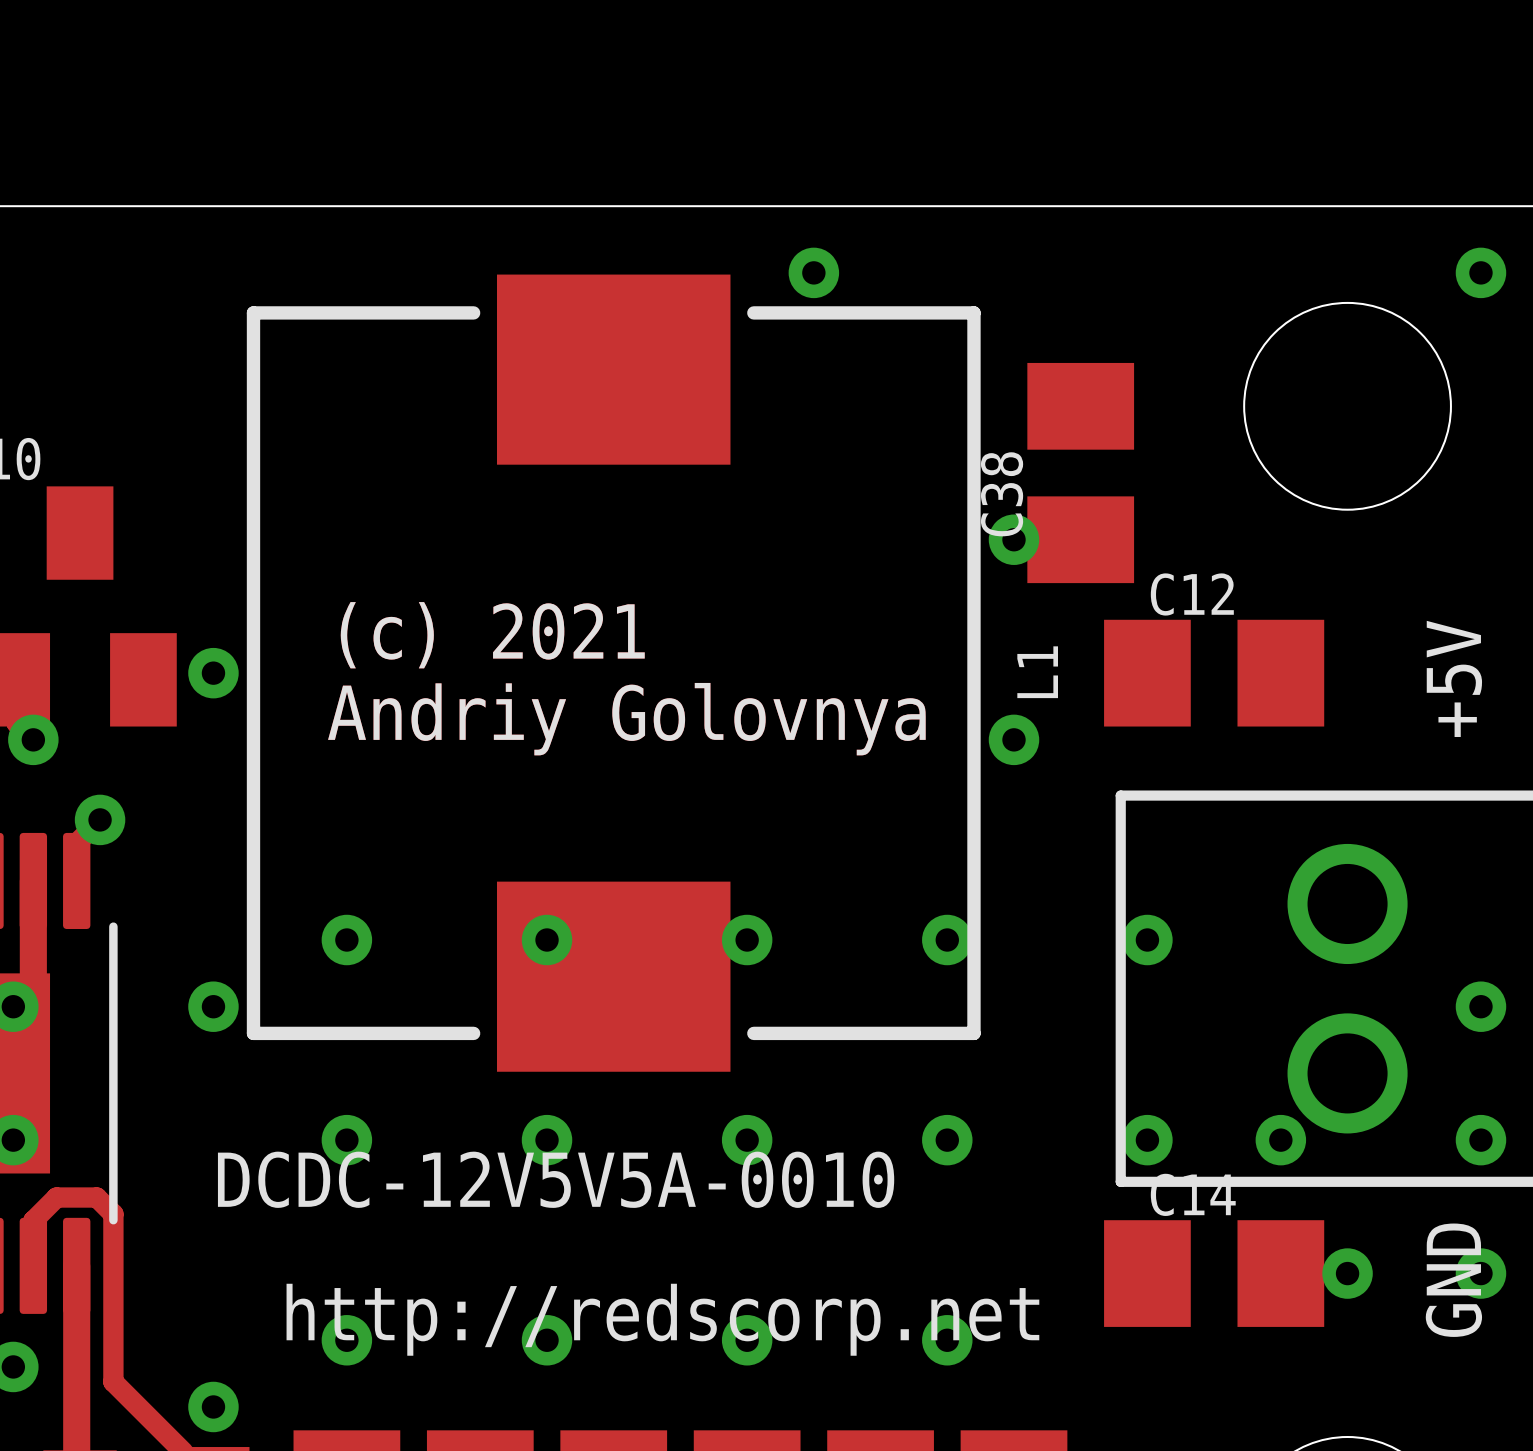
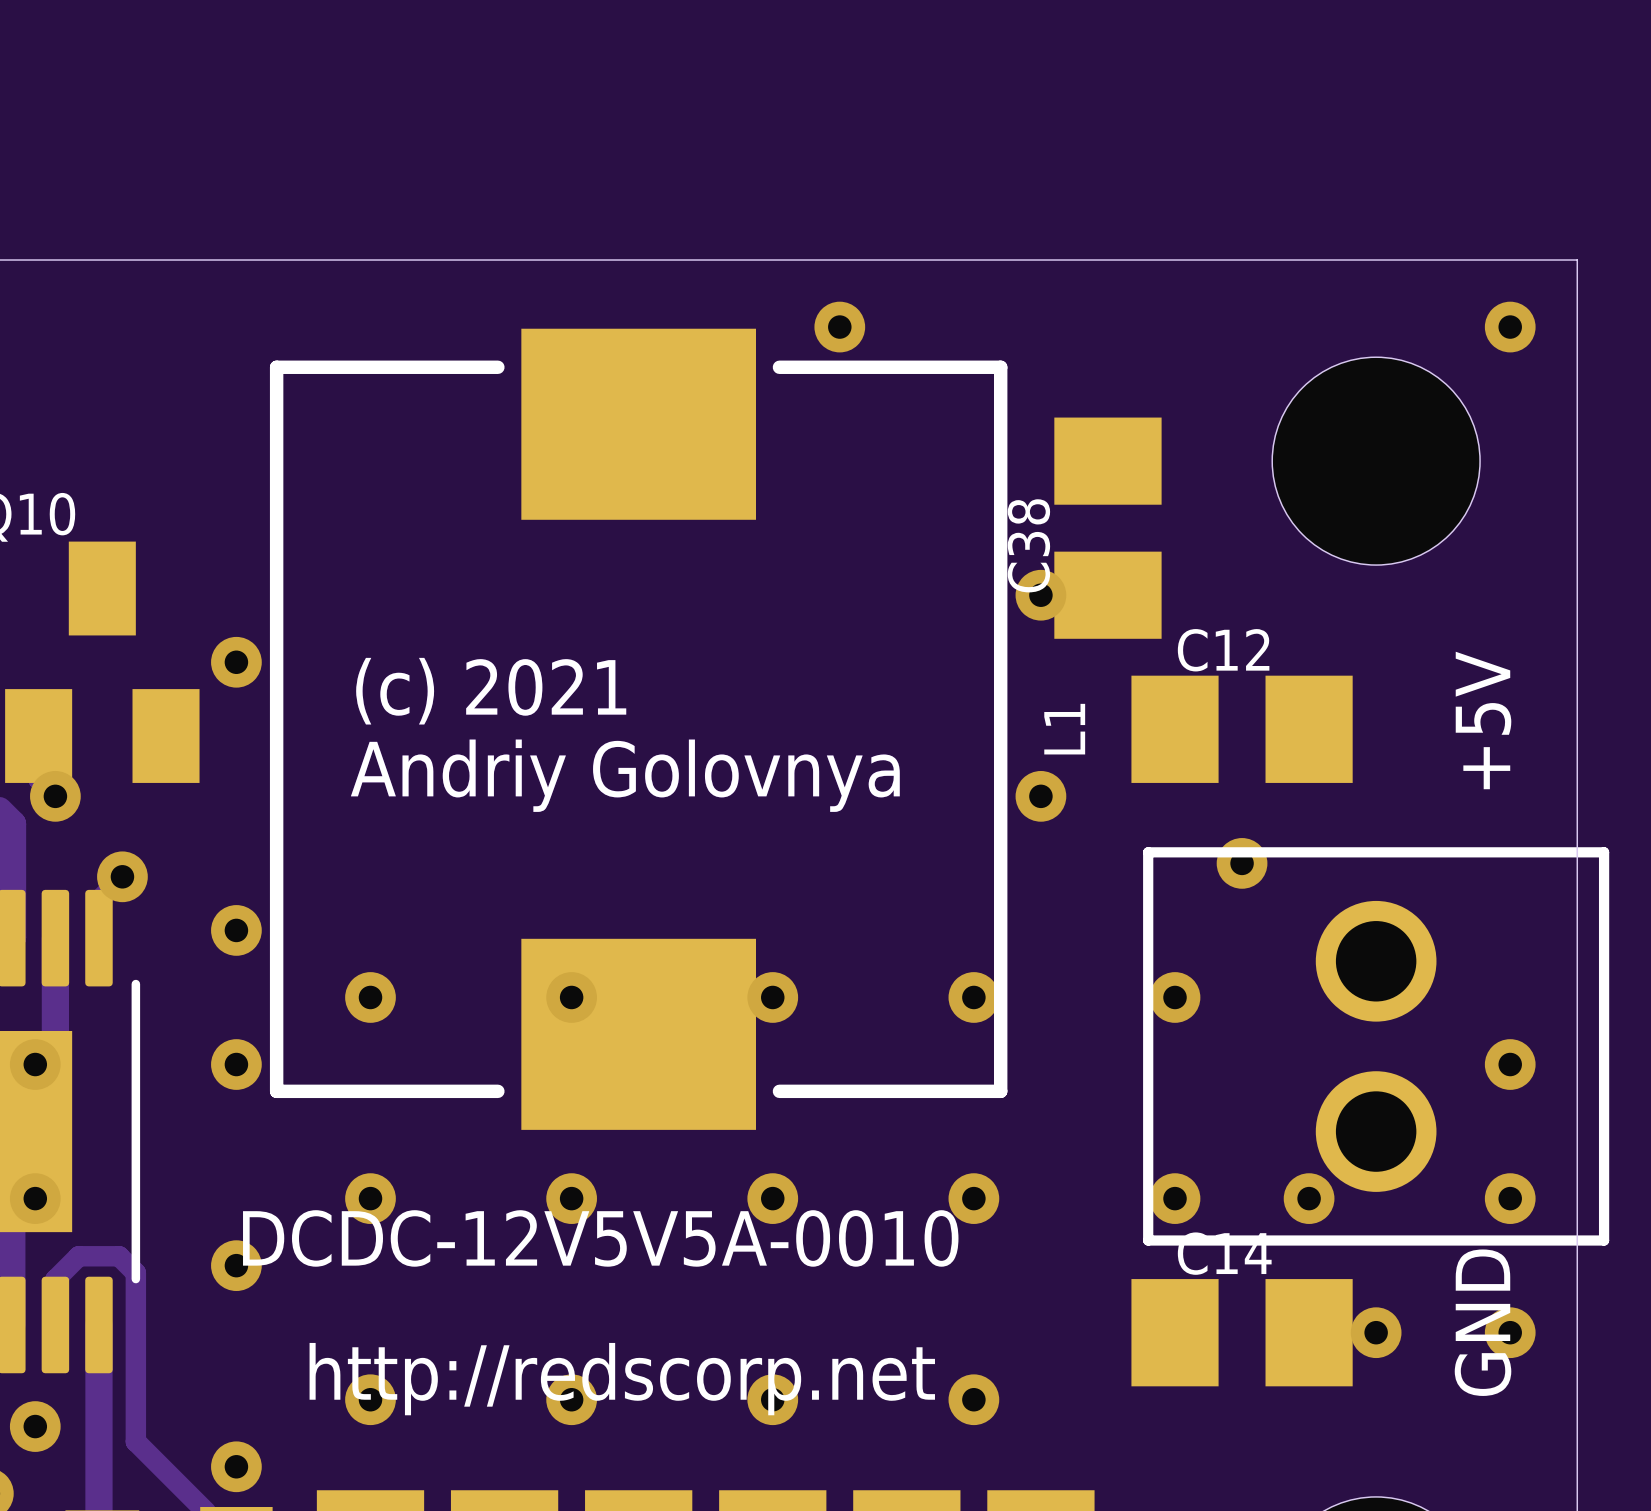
via position: (213, 673) -> (236, 662)
via: none -> (1242, 863)
via: none -> (236, 930)
via: none -> (236, 1265)

